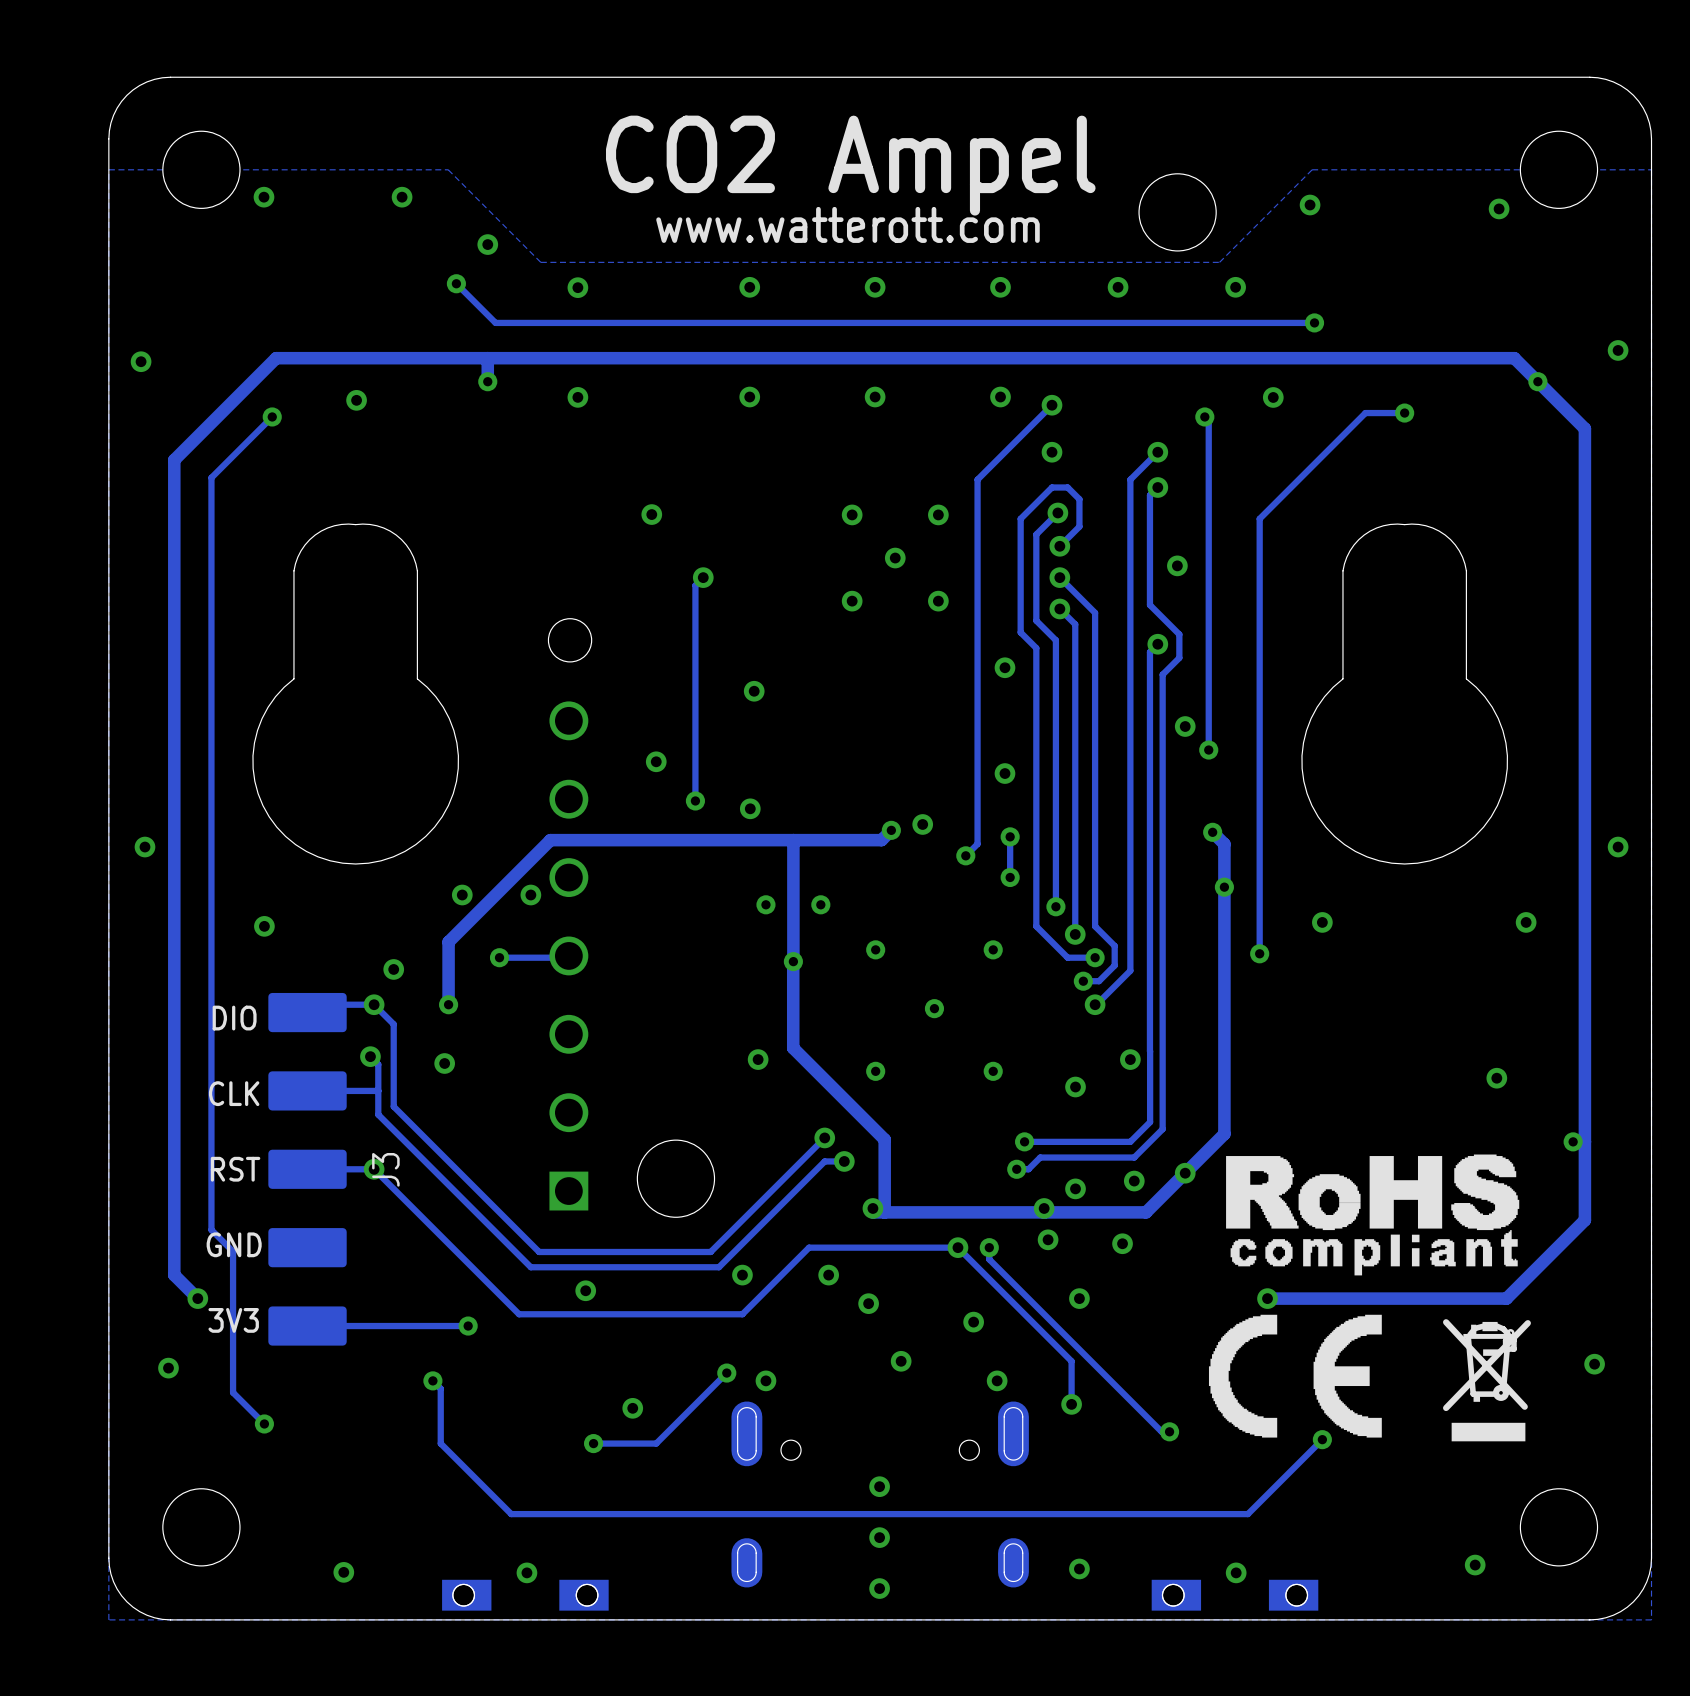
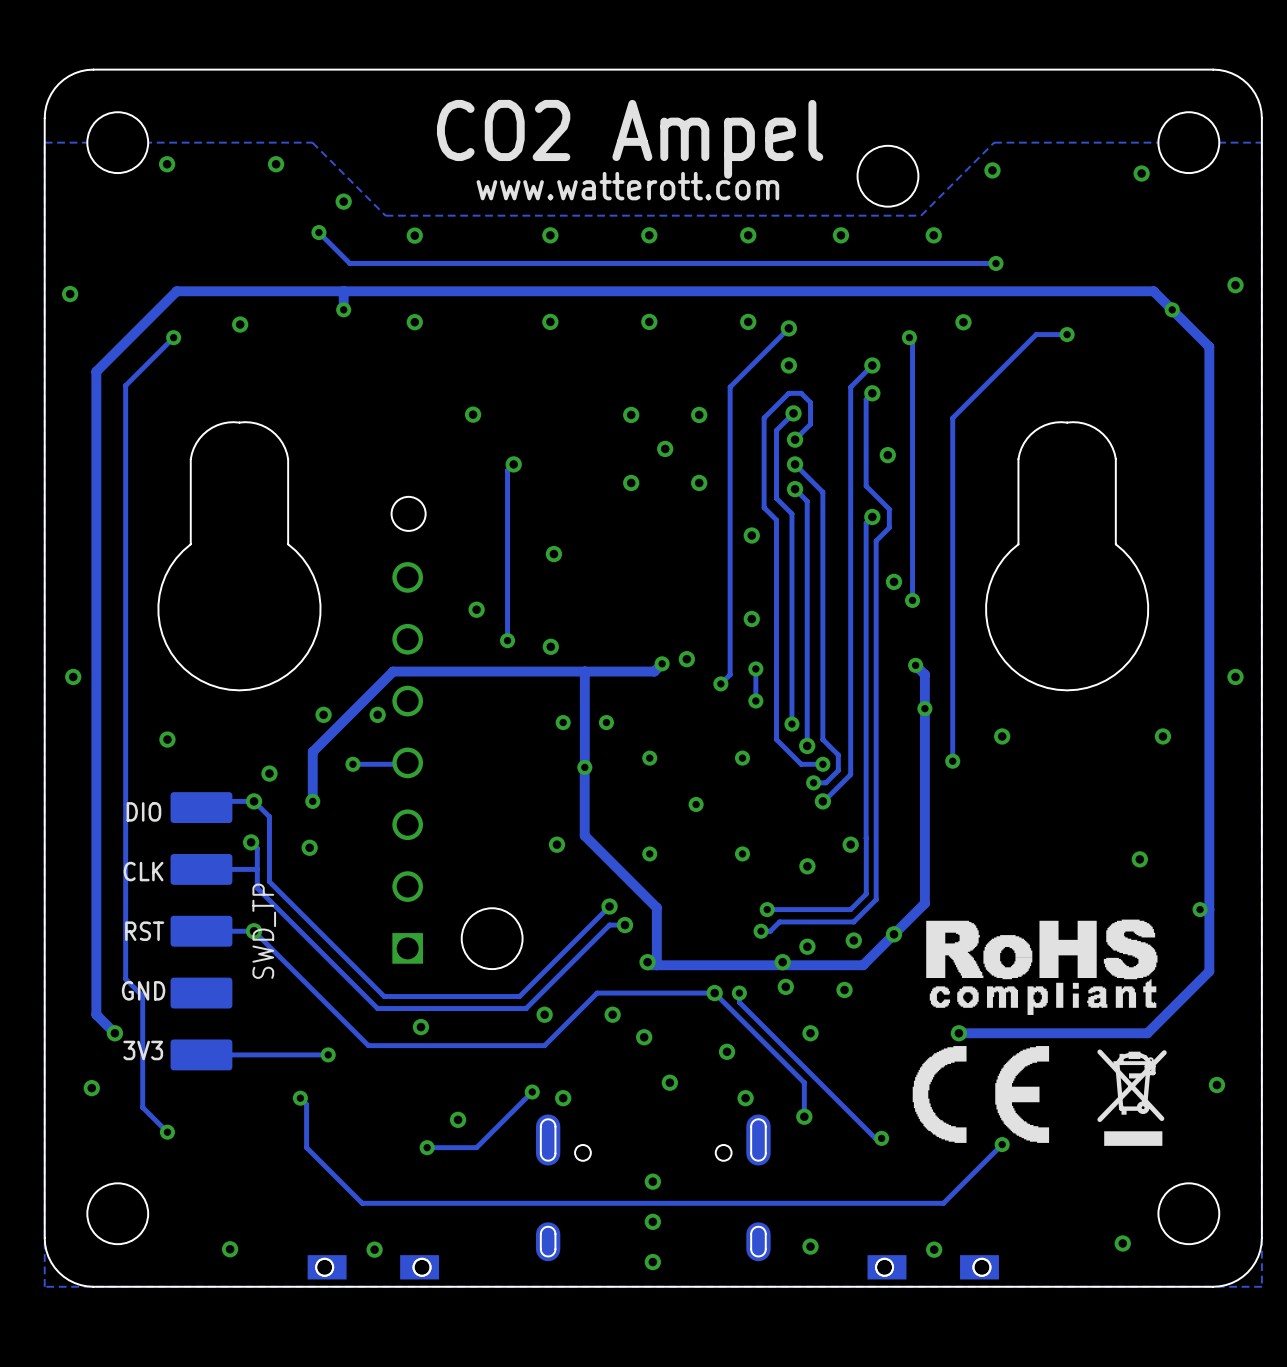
J3 name: J3 (385, 1169) -> SWD_TP (264, 931)

